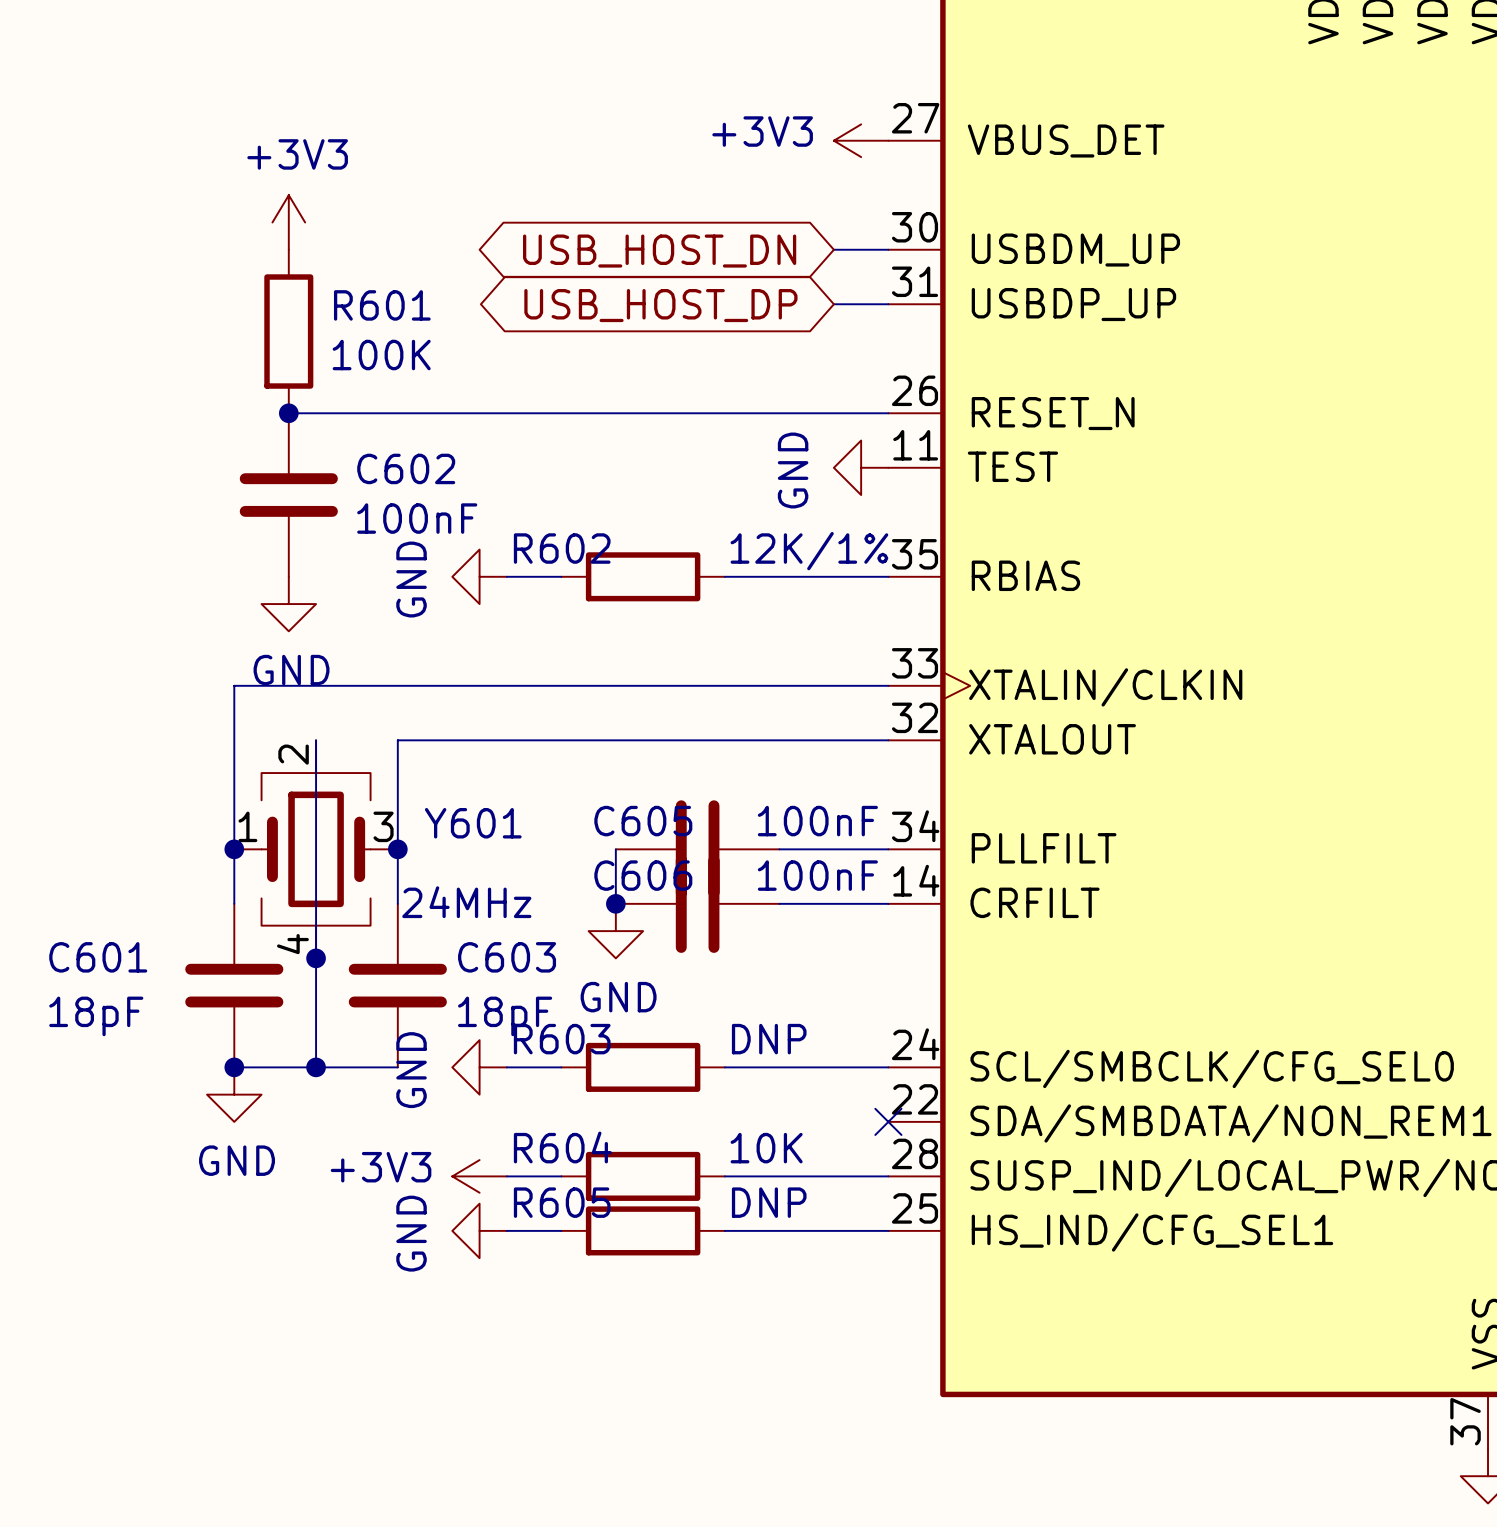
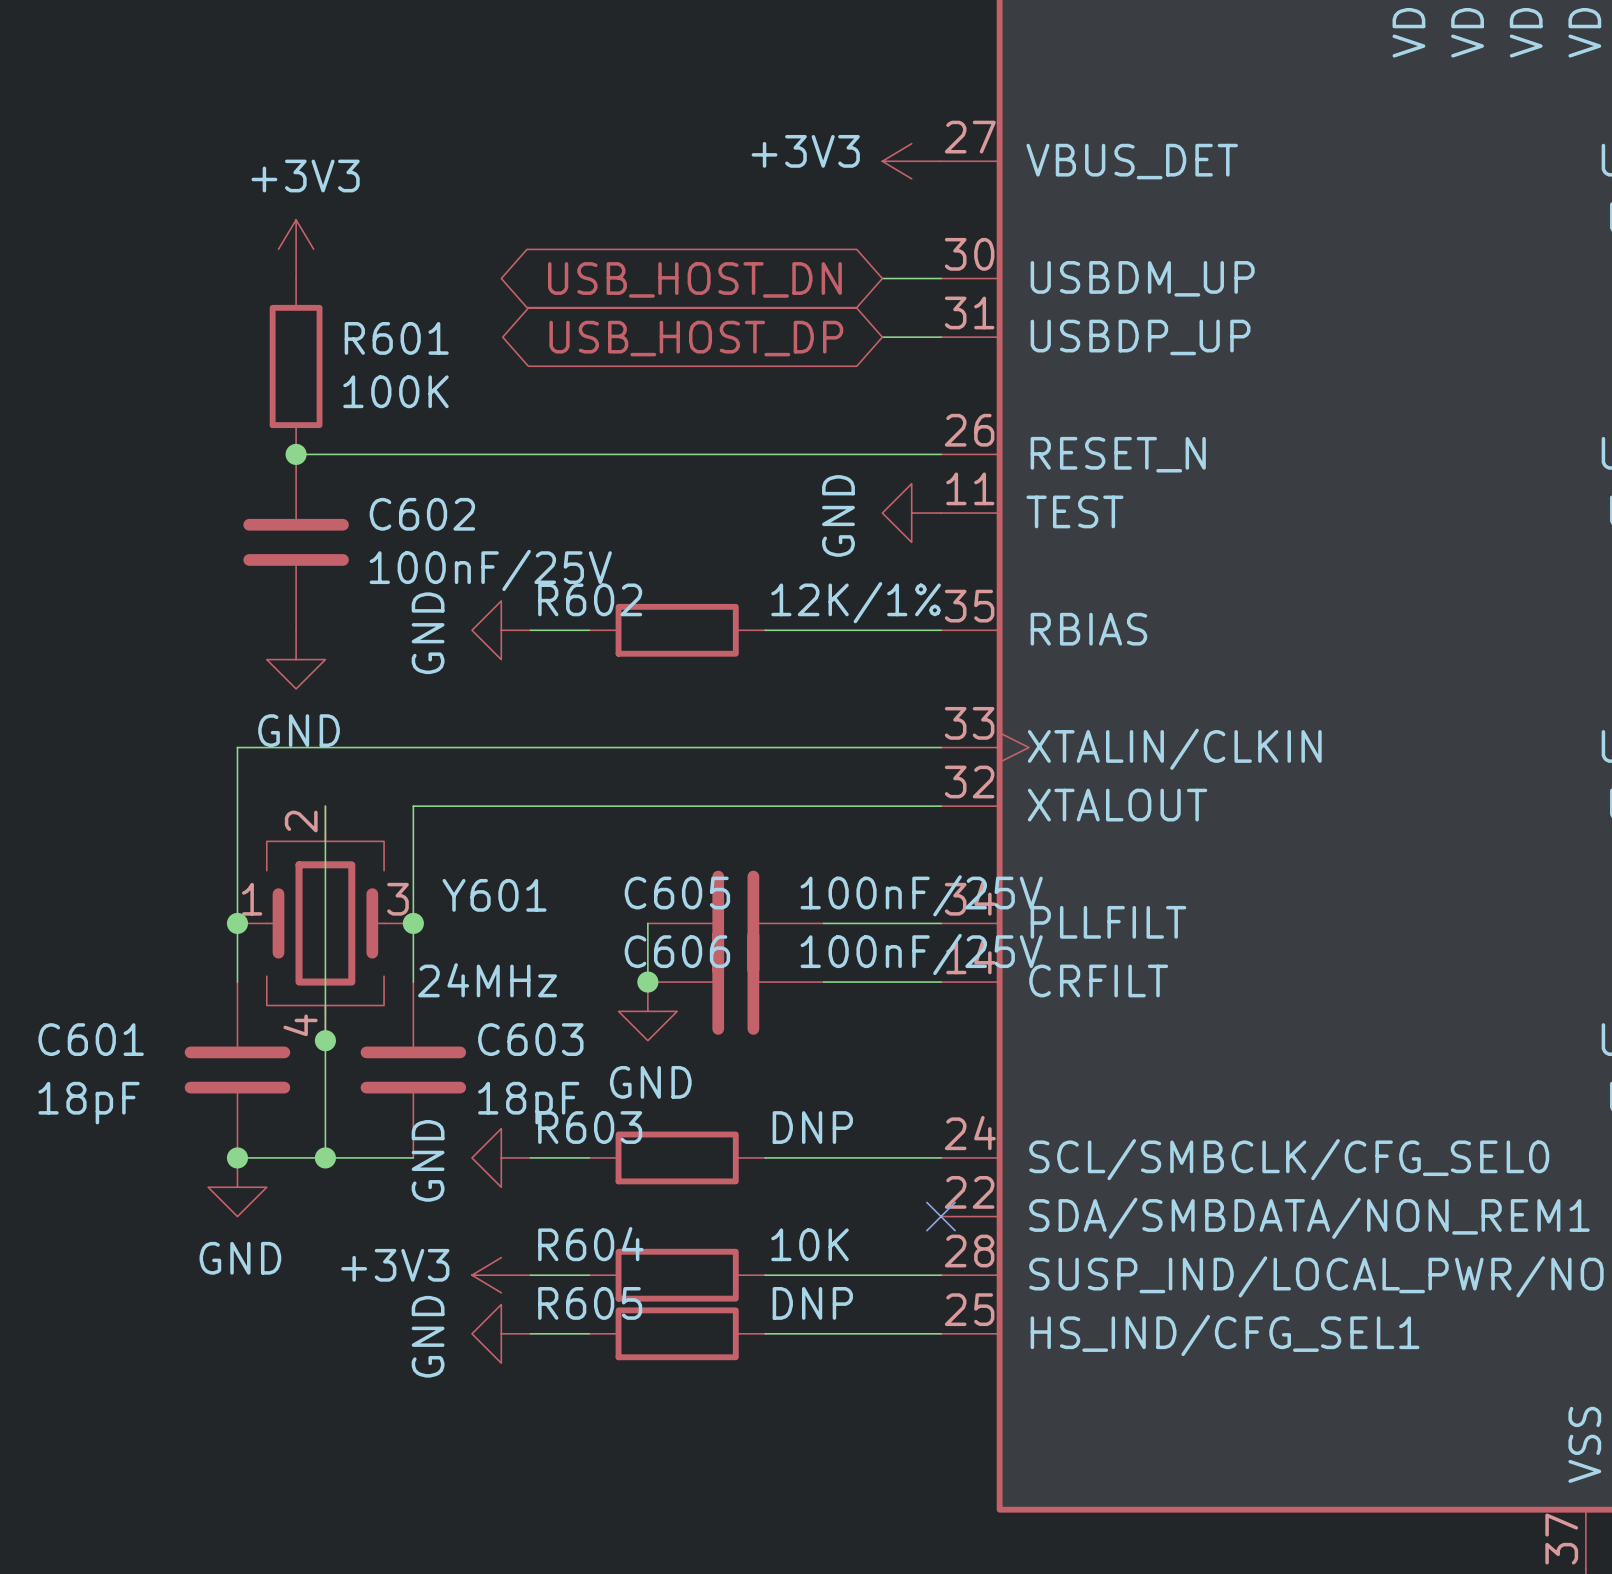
C602 value: 100nF (417, 518) -> 100nF/25V (490, 570)
C605 value: 100nF (817, 821) -> 100nF/25V (921, 895)
C606 value: 100nF (817, 875) -> 100nF/25V (921, 954)

